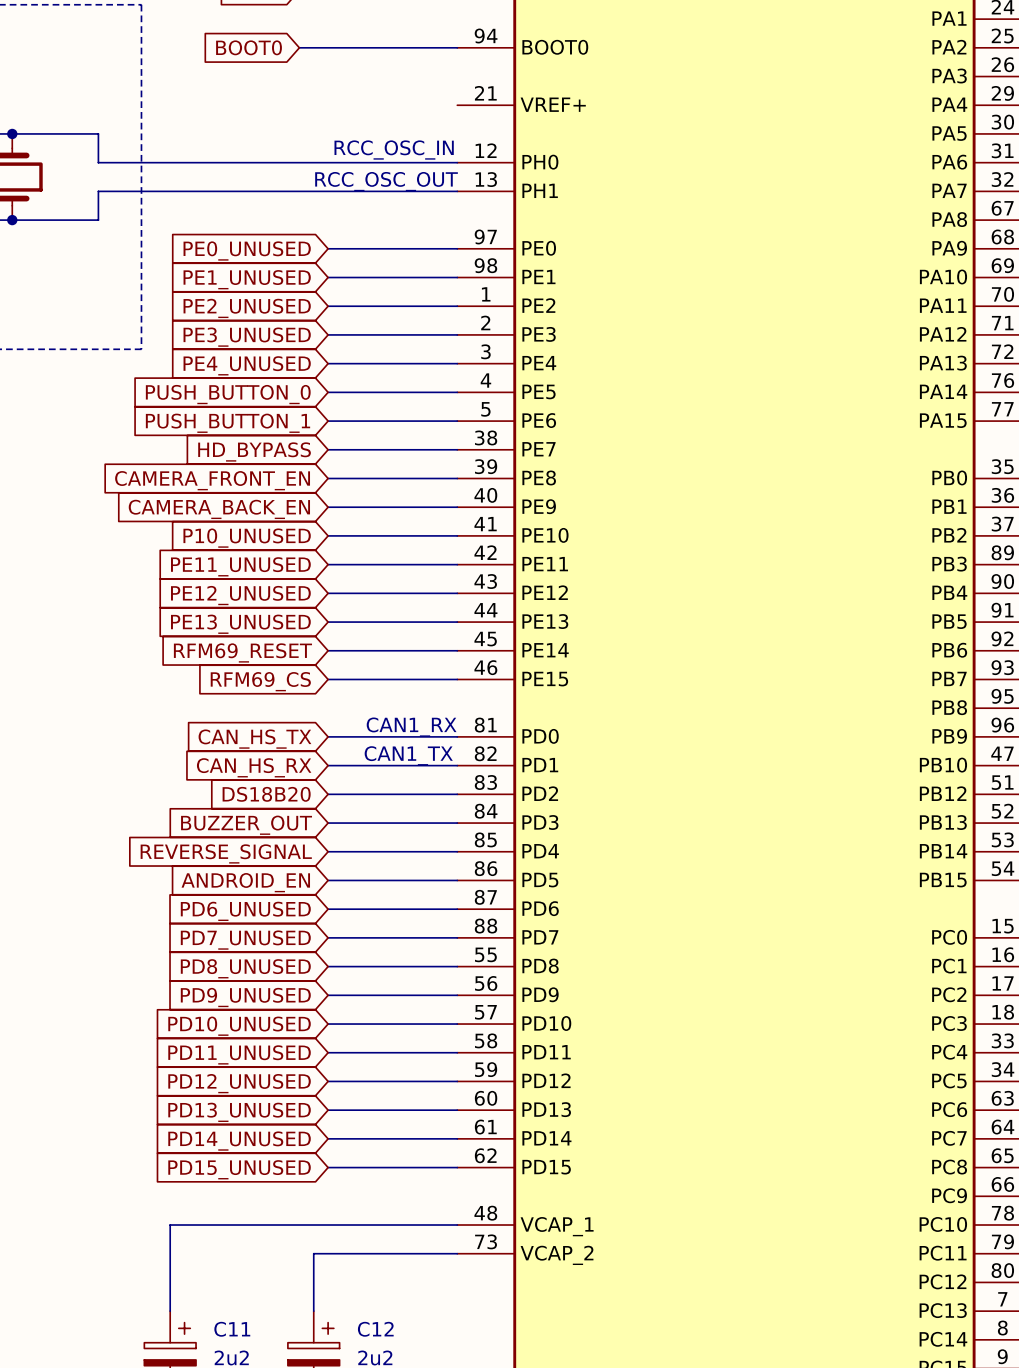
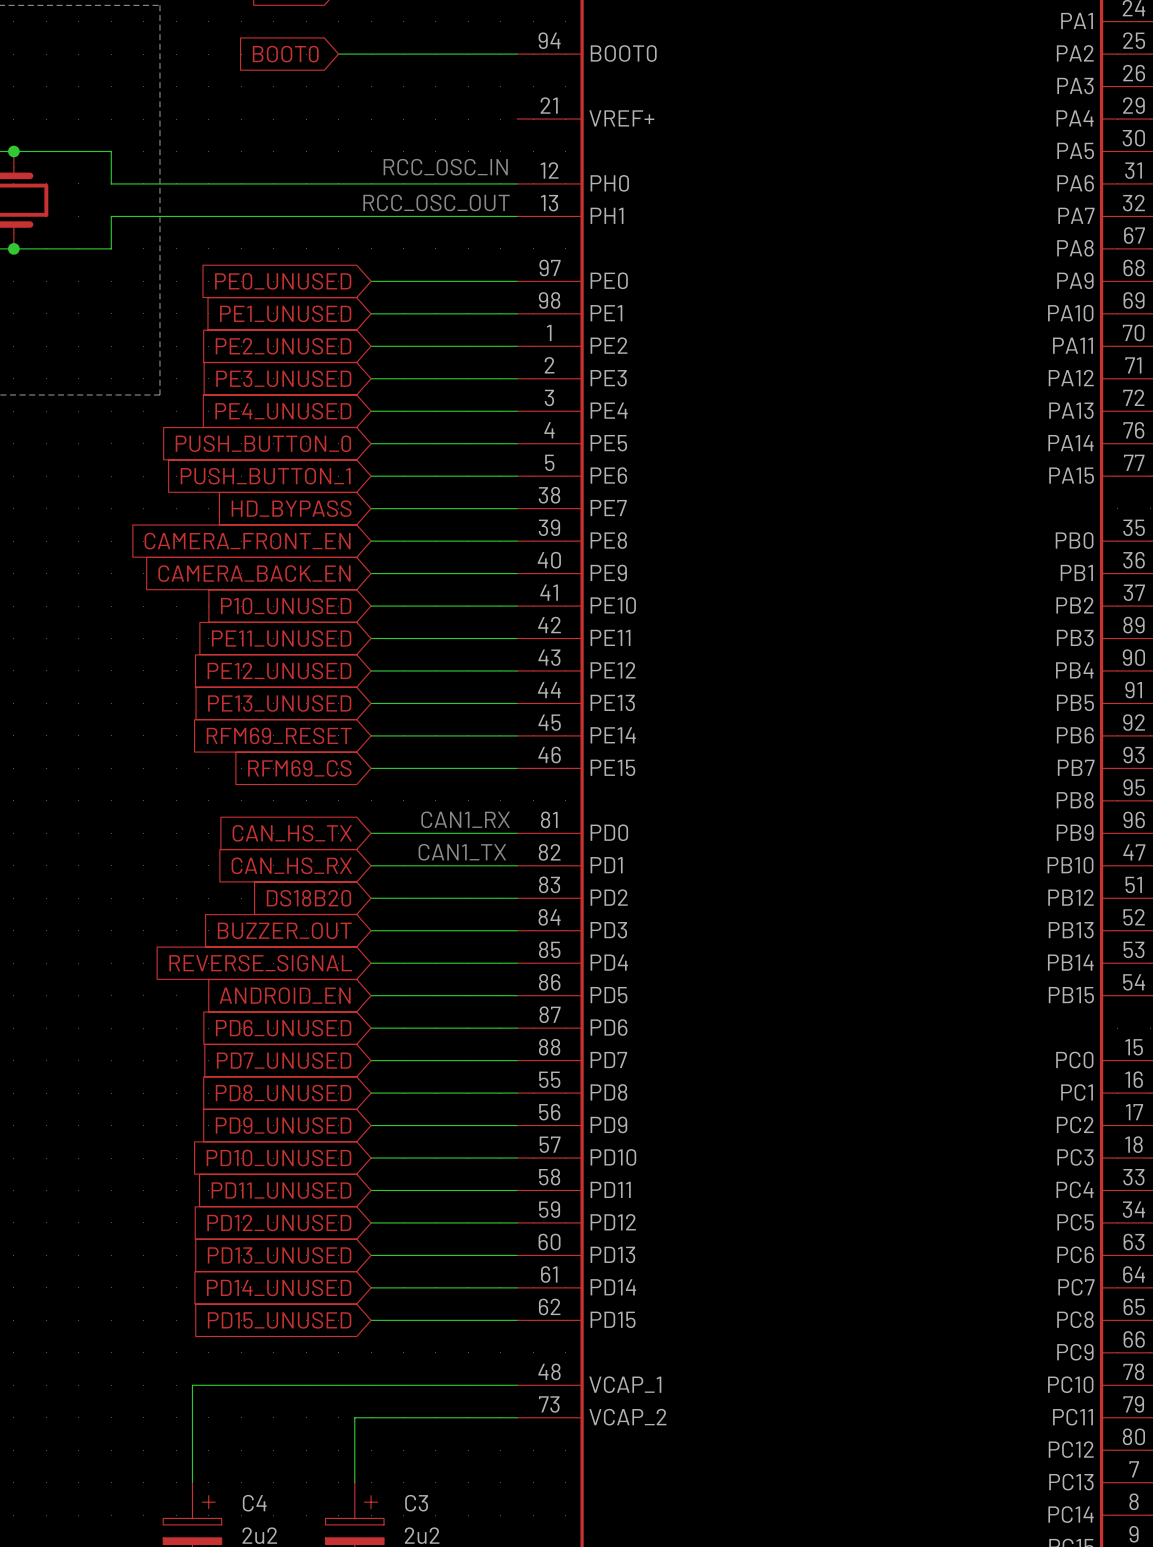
C11 name: C11 (232, 1329) -> C4 (254, 1503)
C12 name: C12 (375, 1329) -> C3 (416, 1503)

